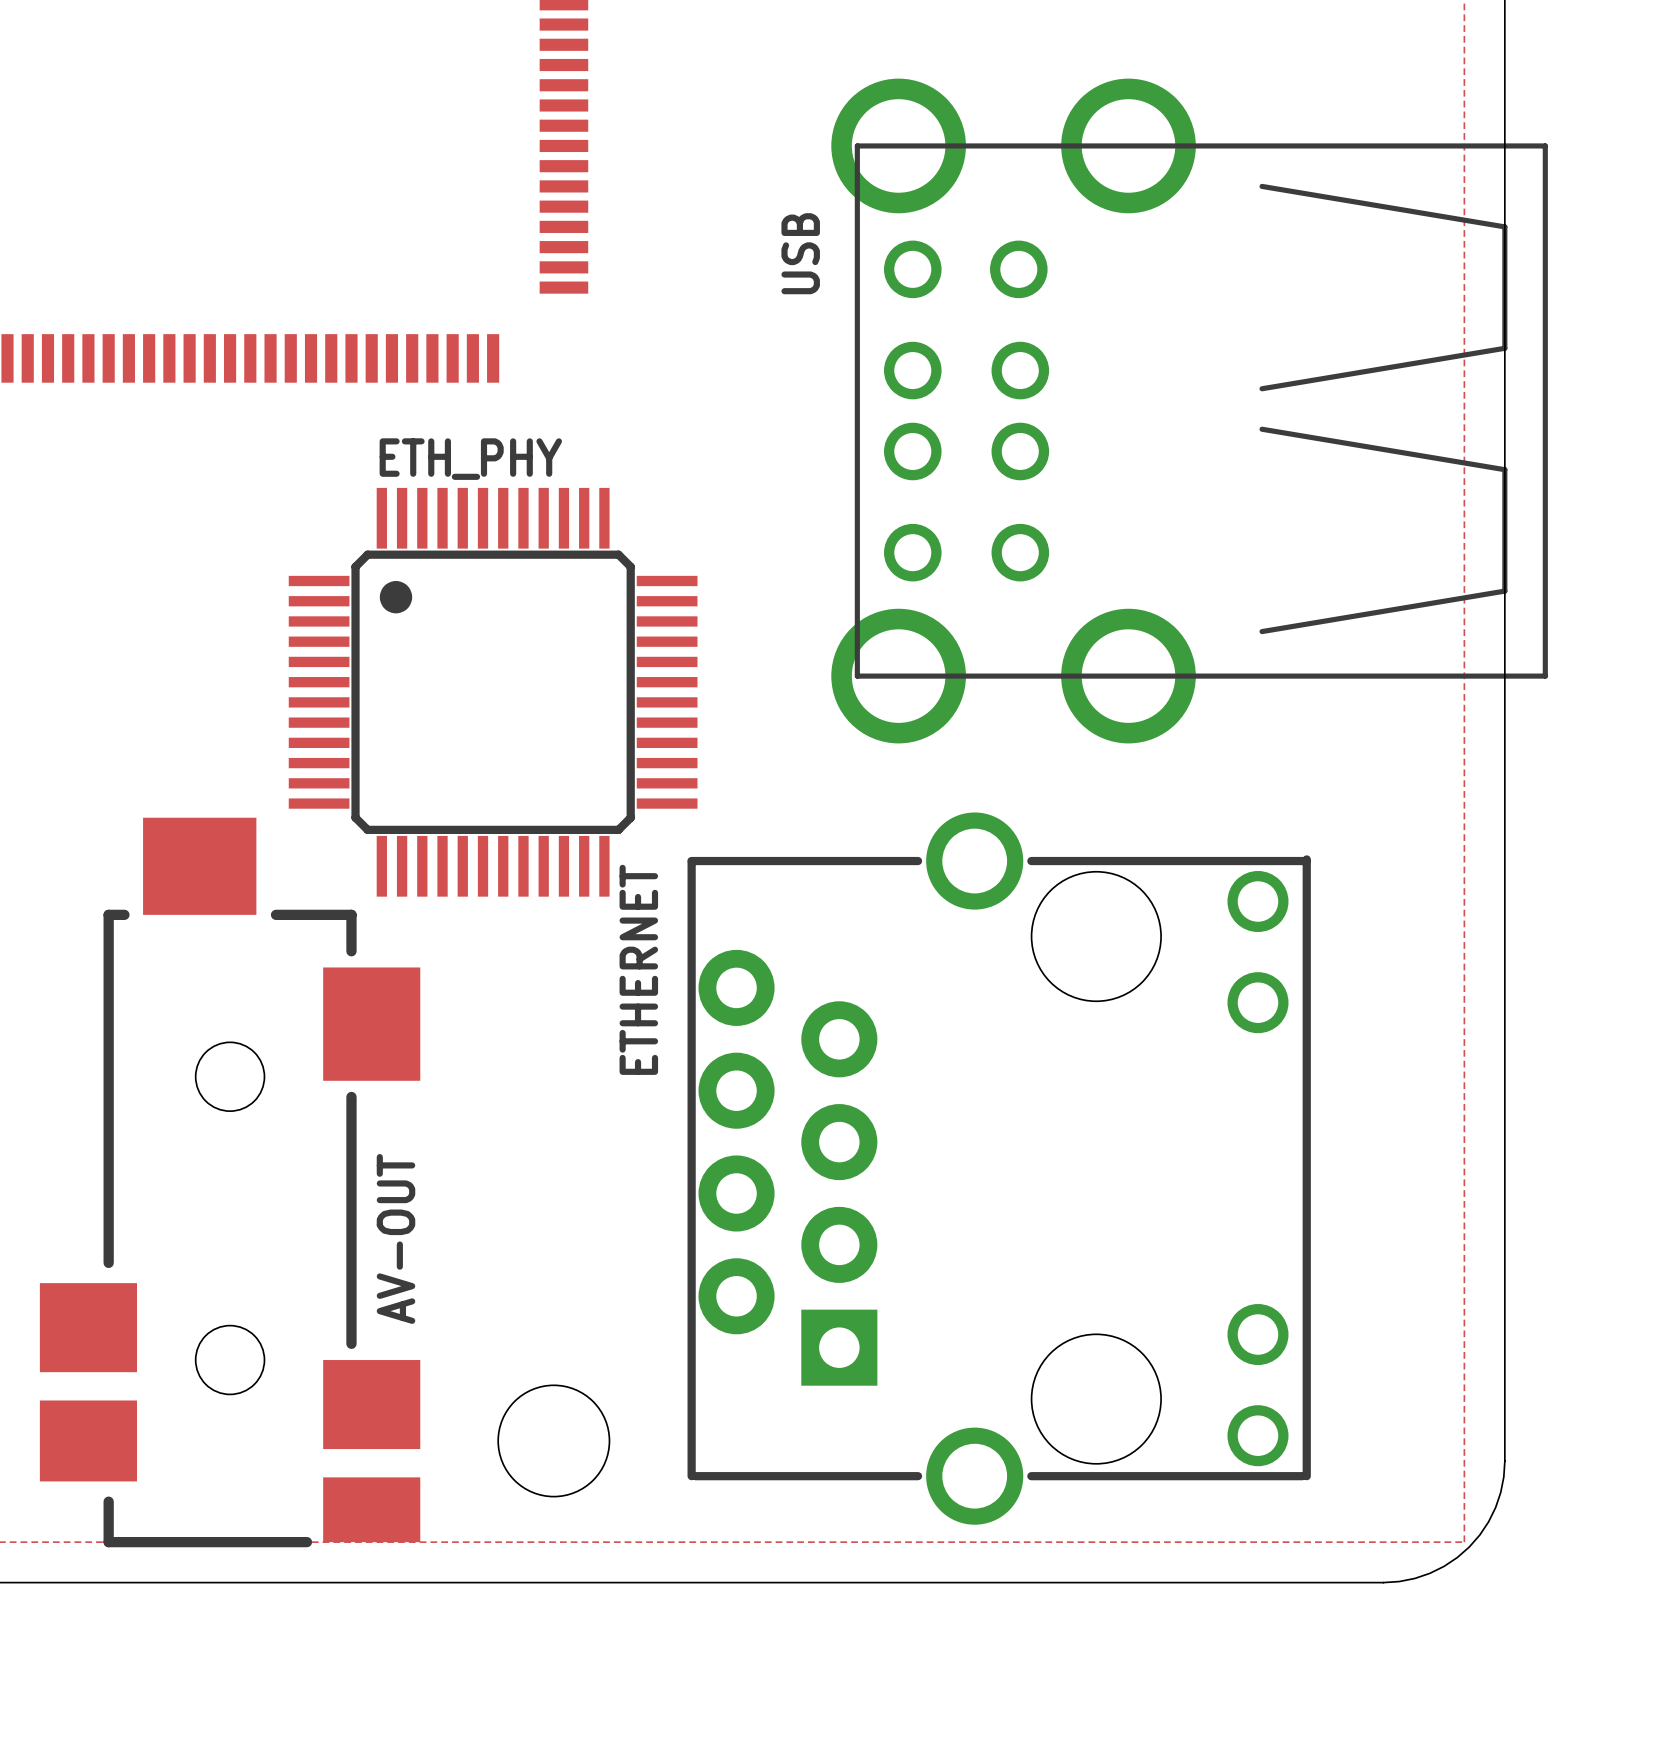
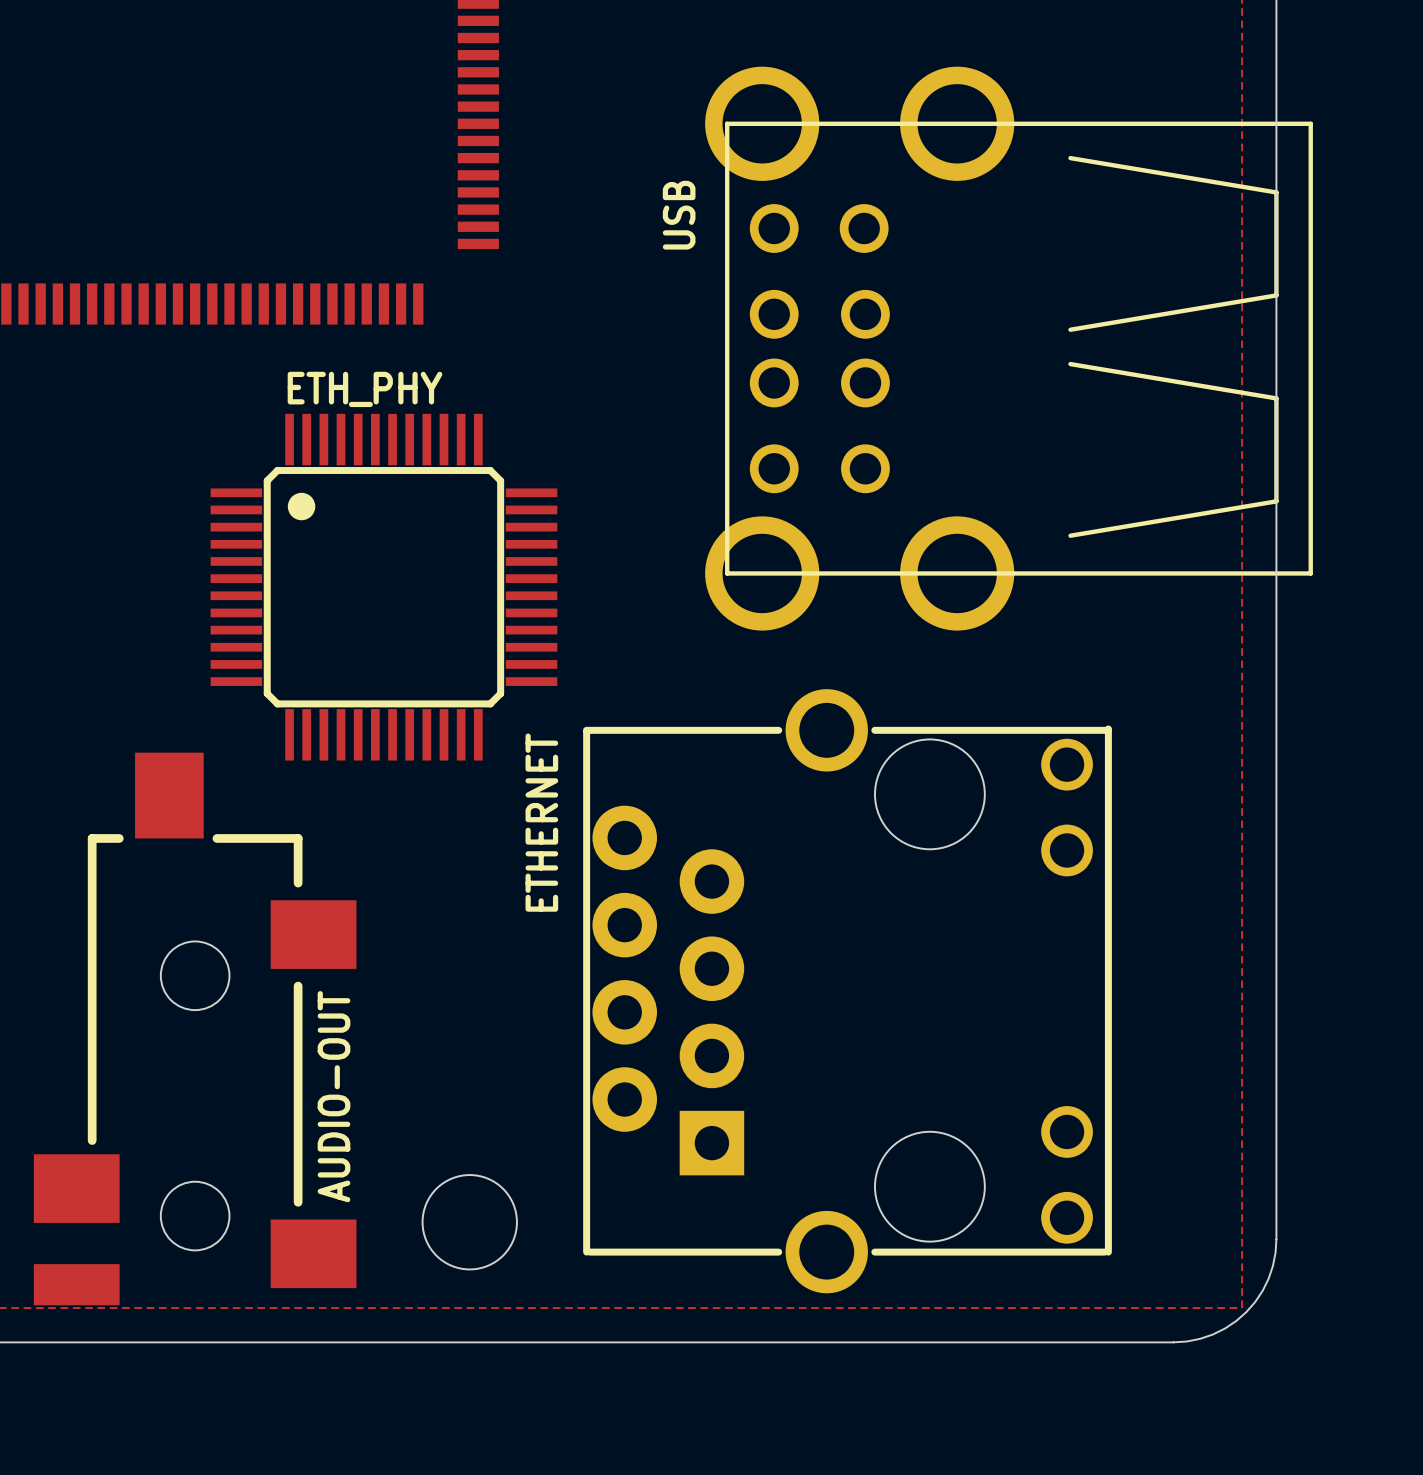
ETH_PHY position: (493, 692) -> (383, 587)
AV-OUT: (230, 1182) -> none
AUDIO-OUT: none -> (195, 1028)

